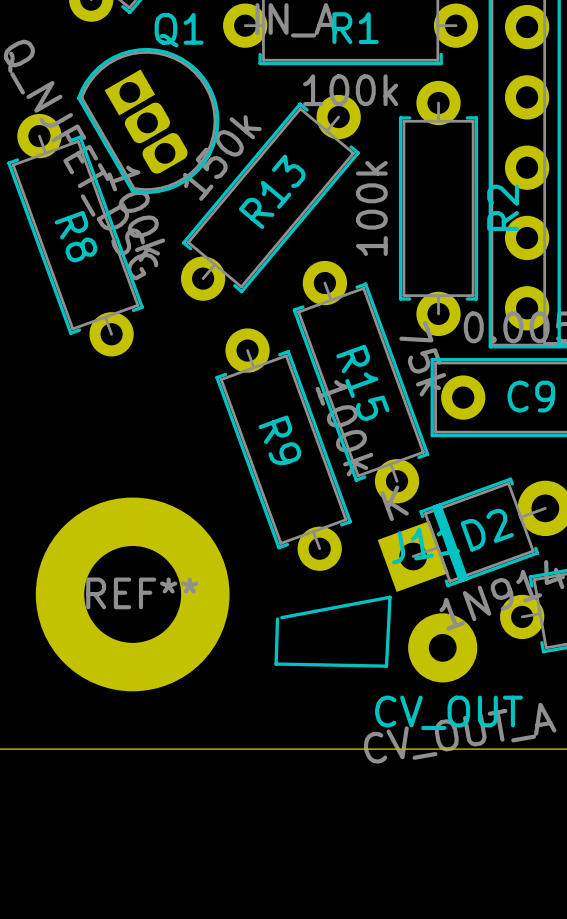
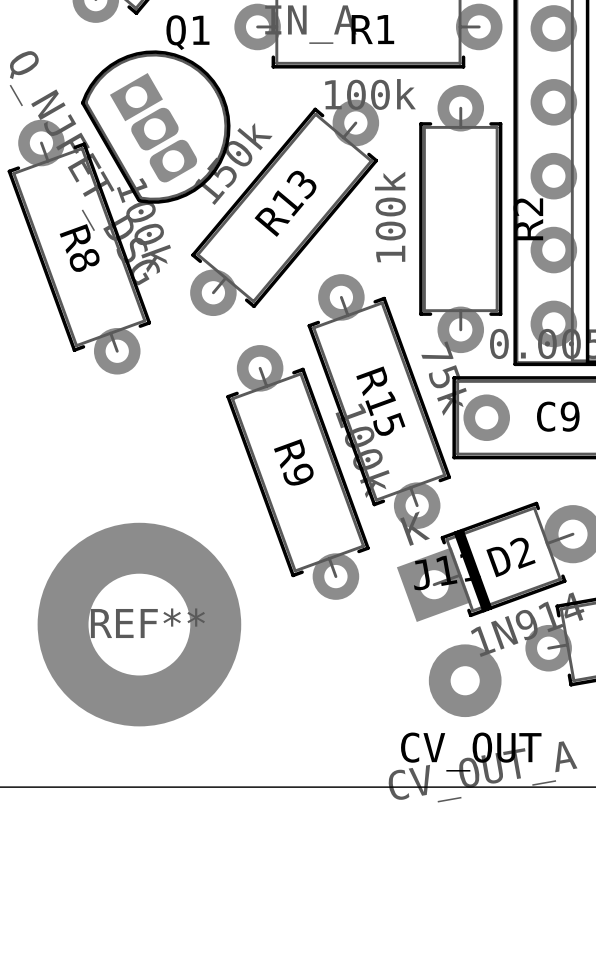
line: (281, 617) (390, 597) (386, 666) (276, 664) (277, 619) -> none

